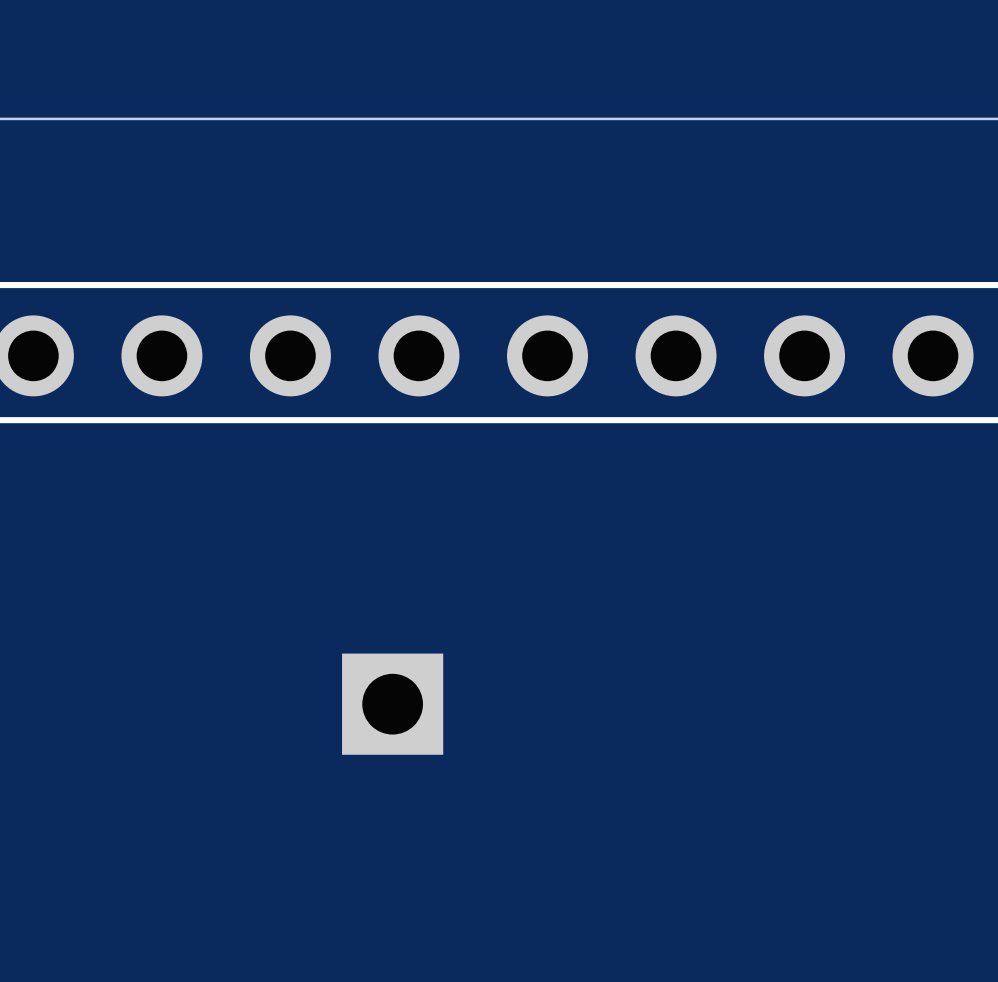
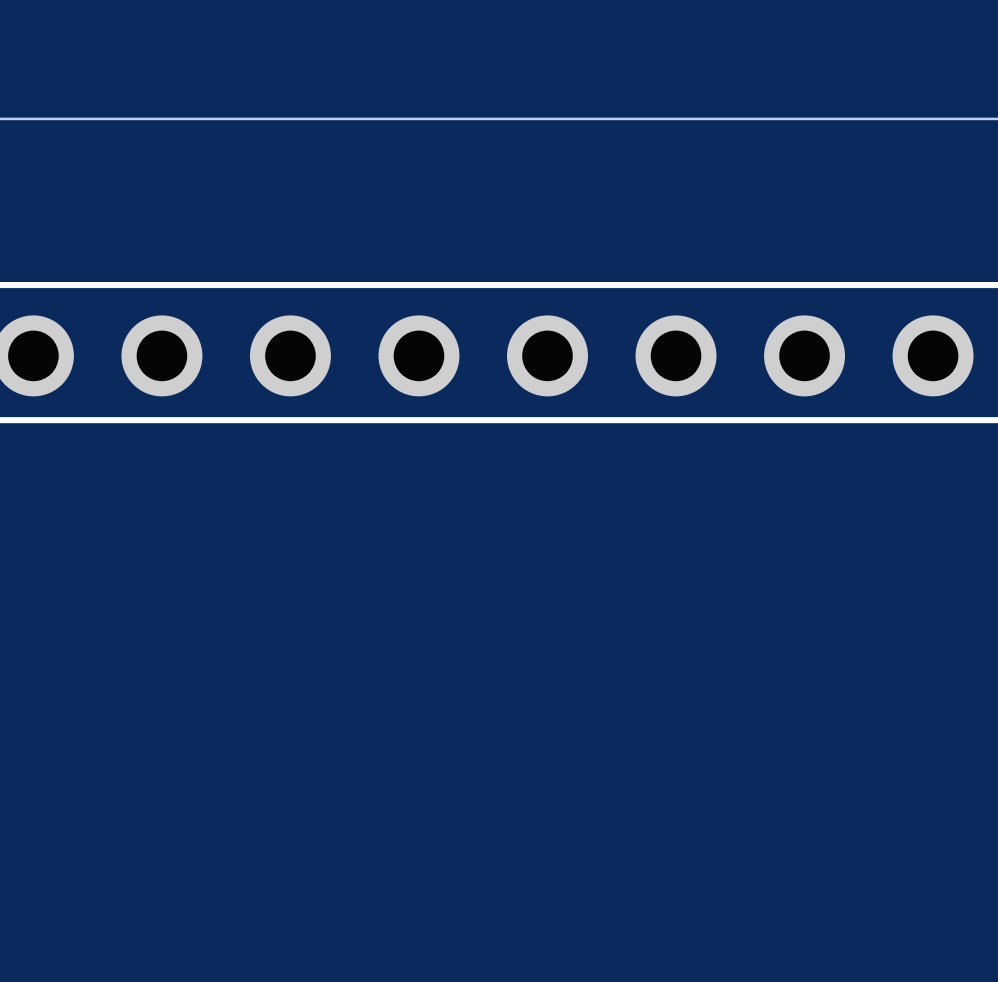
part: (392, 704) -> none

